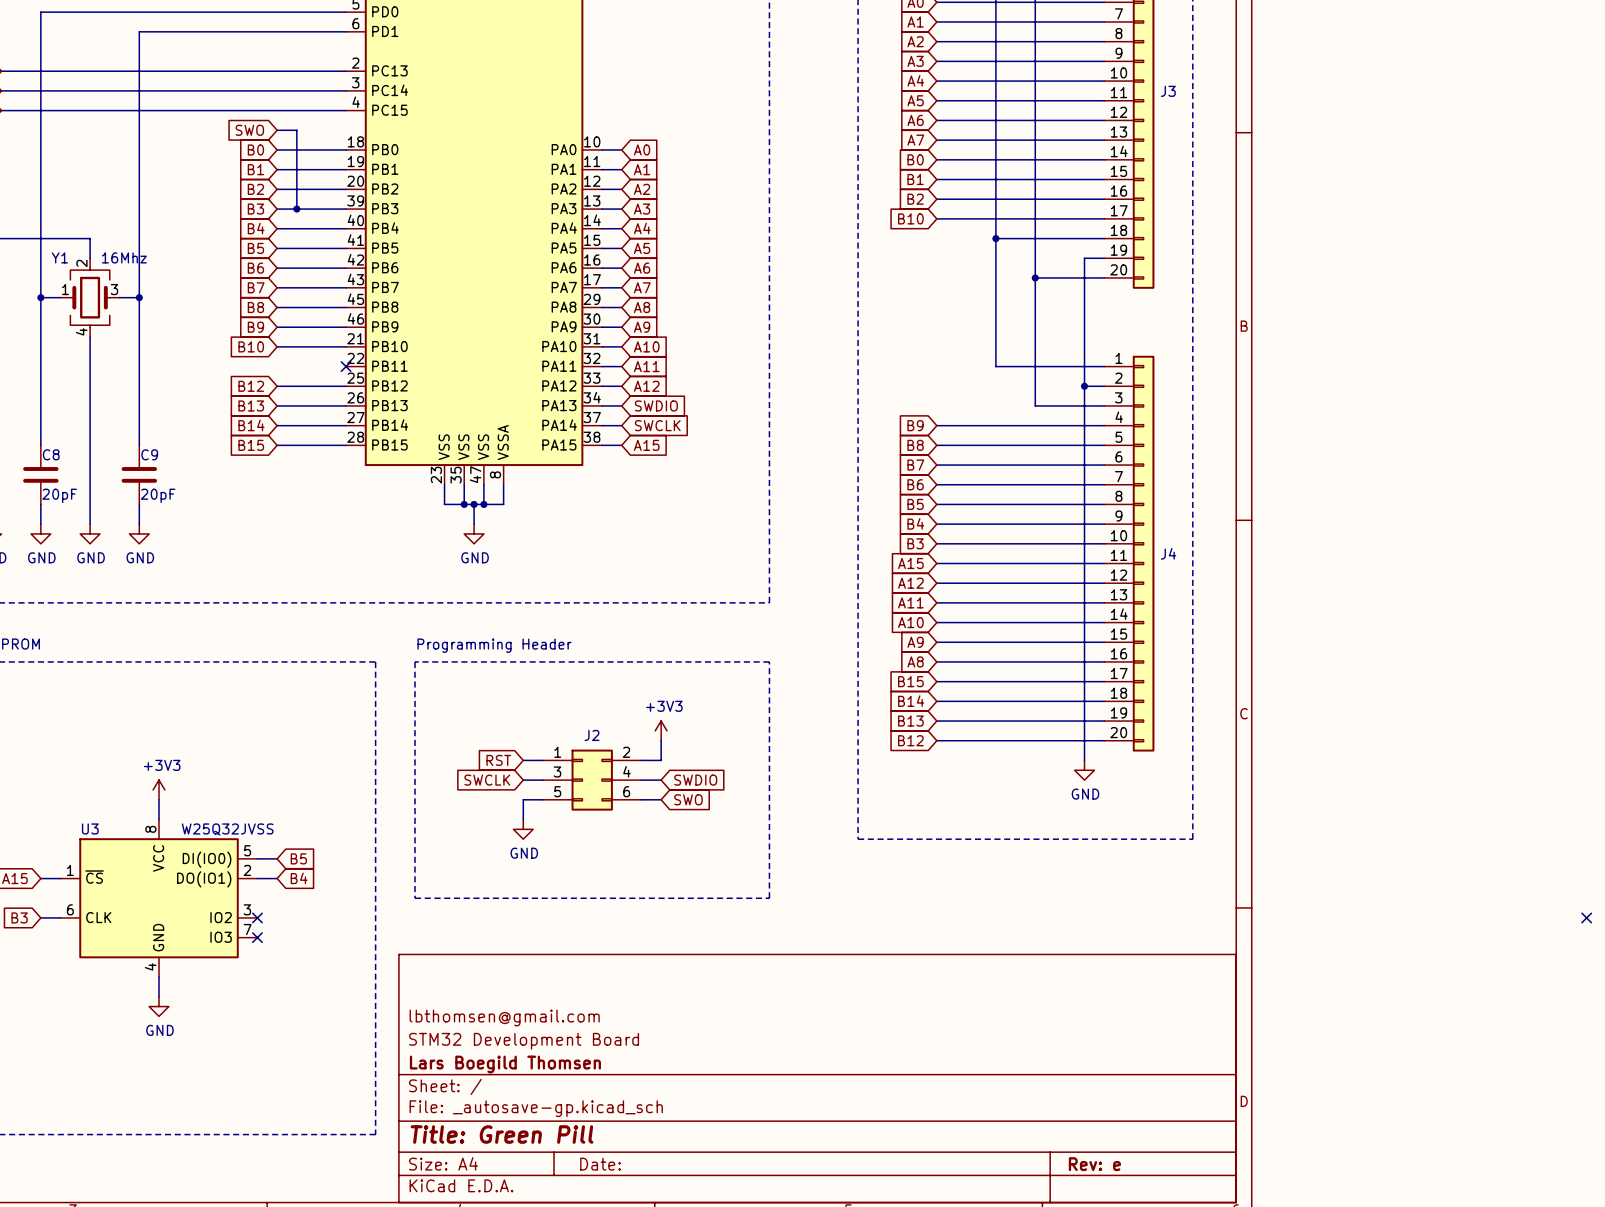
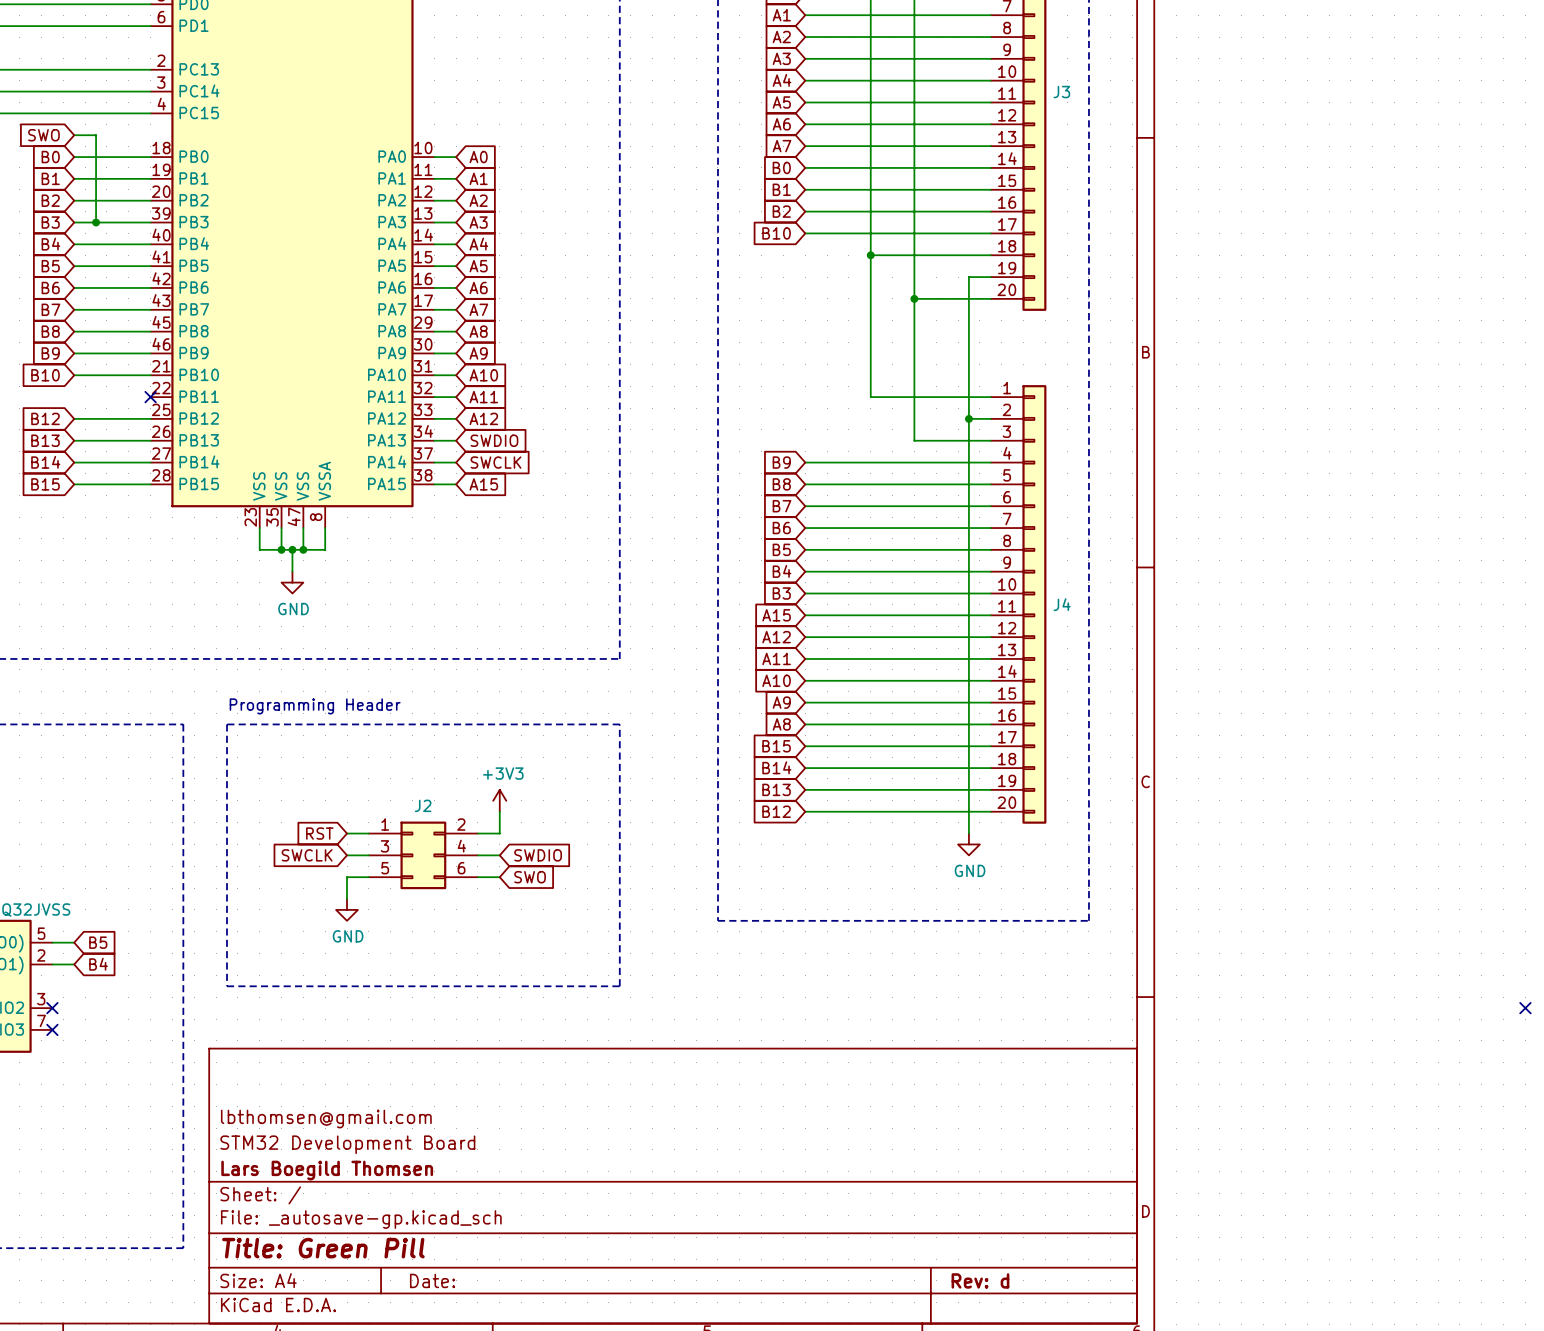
title block: Rev: e (1094, 1164) -> Rev: d (980, 1280)

